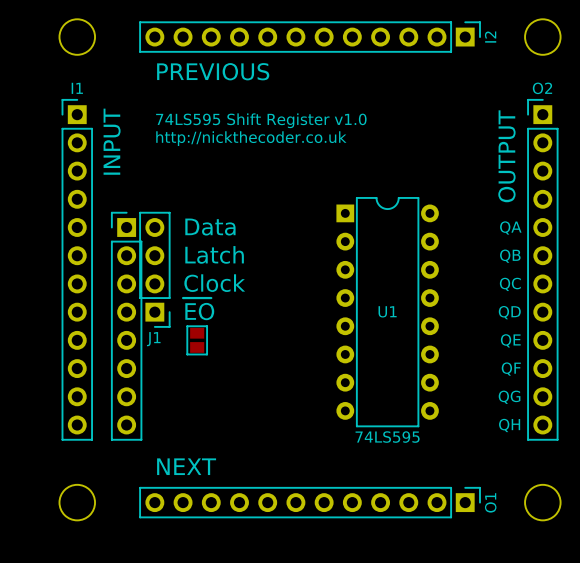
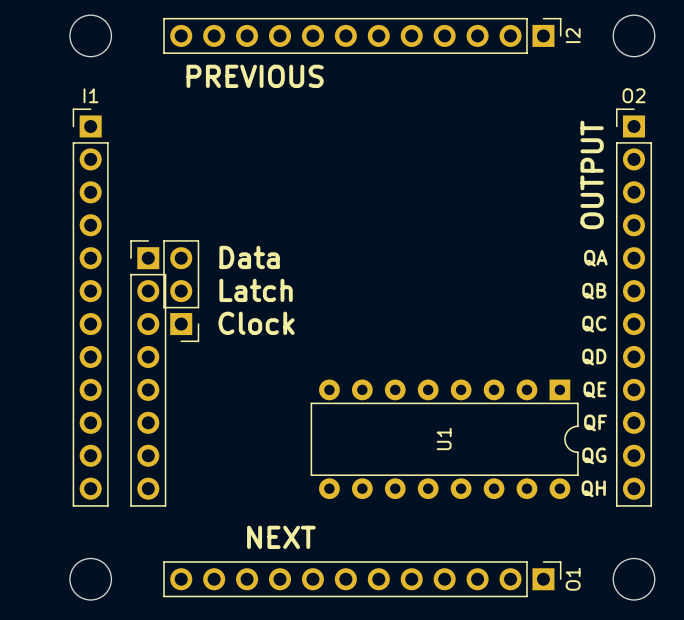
text: 74LS595 Shift Register v1.0 (261, 120) -> none
text: http://nickthecoder.co.uk (251, 138) -> none
text: INPUT (112, 141) -> none
part: none -> (181, 291)
J1: (154, 269) -> none
line: (183, 298) (211, 298) -> none
text: EO (199, 311) -> none
U1 rotation: 0° (387, 312) -> 90° clockwise (444, 439)
part: (197, 340) -> none
U1 value: 74LS595 (387, 437) -> none
text position: NEXT (186, 466) -> NEXT (281, 537)

